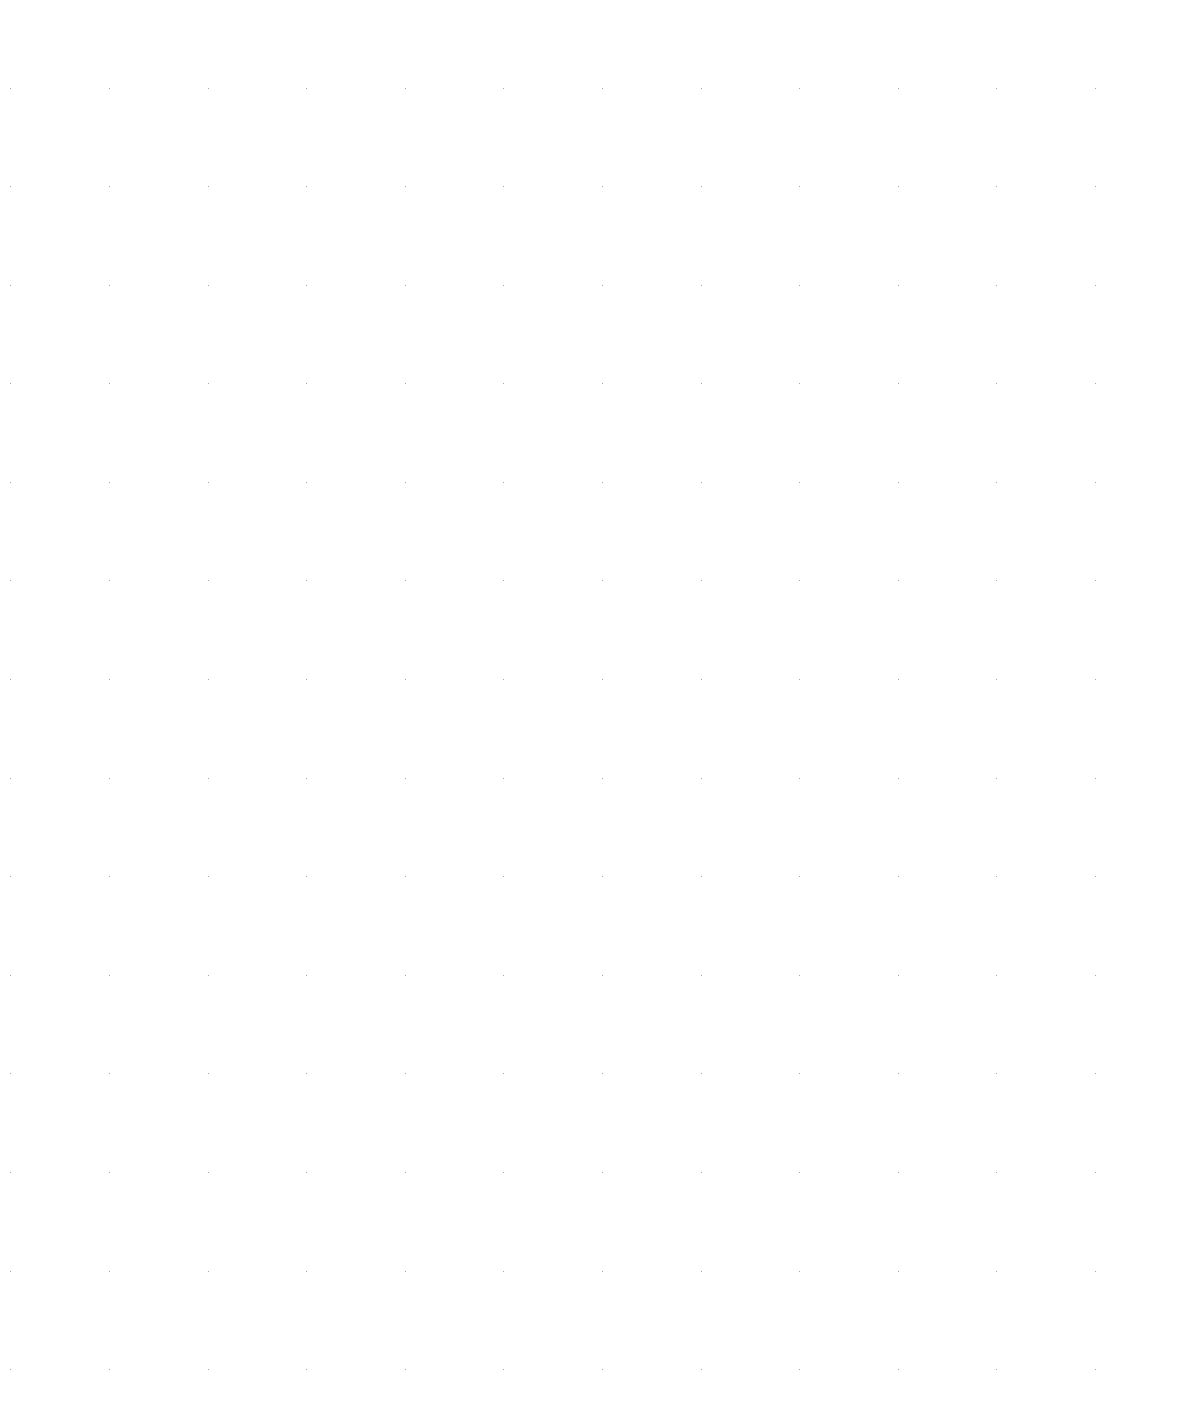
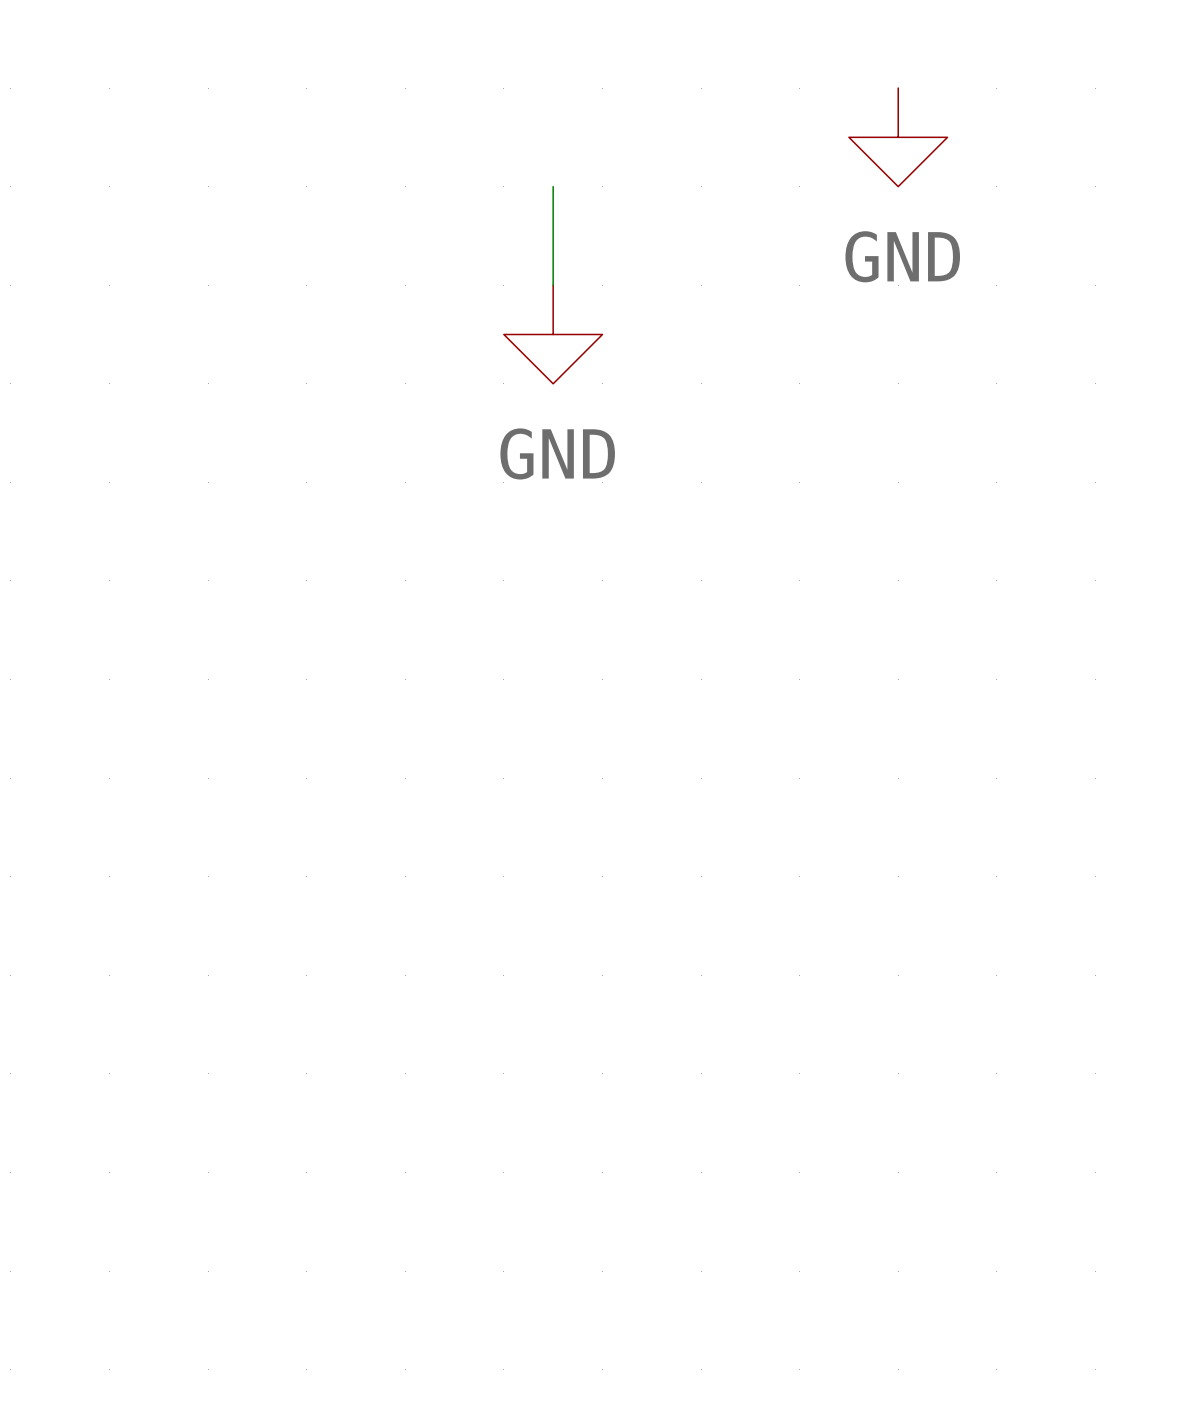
power symbol: none -> GND (898, 137)
wire: none -> (553, 186) (553, 285)
power symbol: none -> GND (553, 334)

